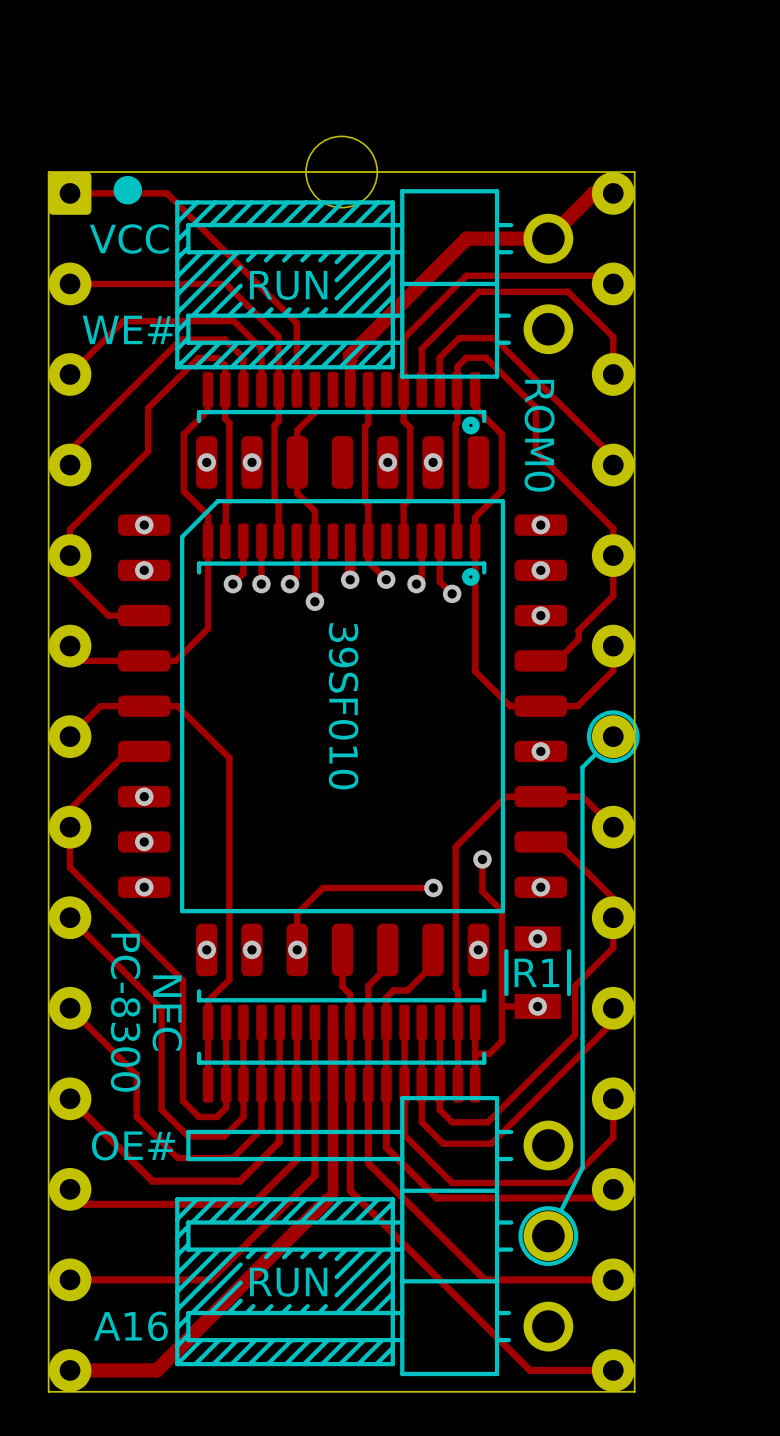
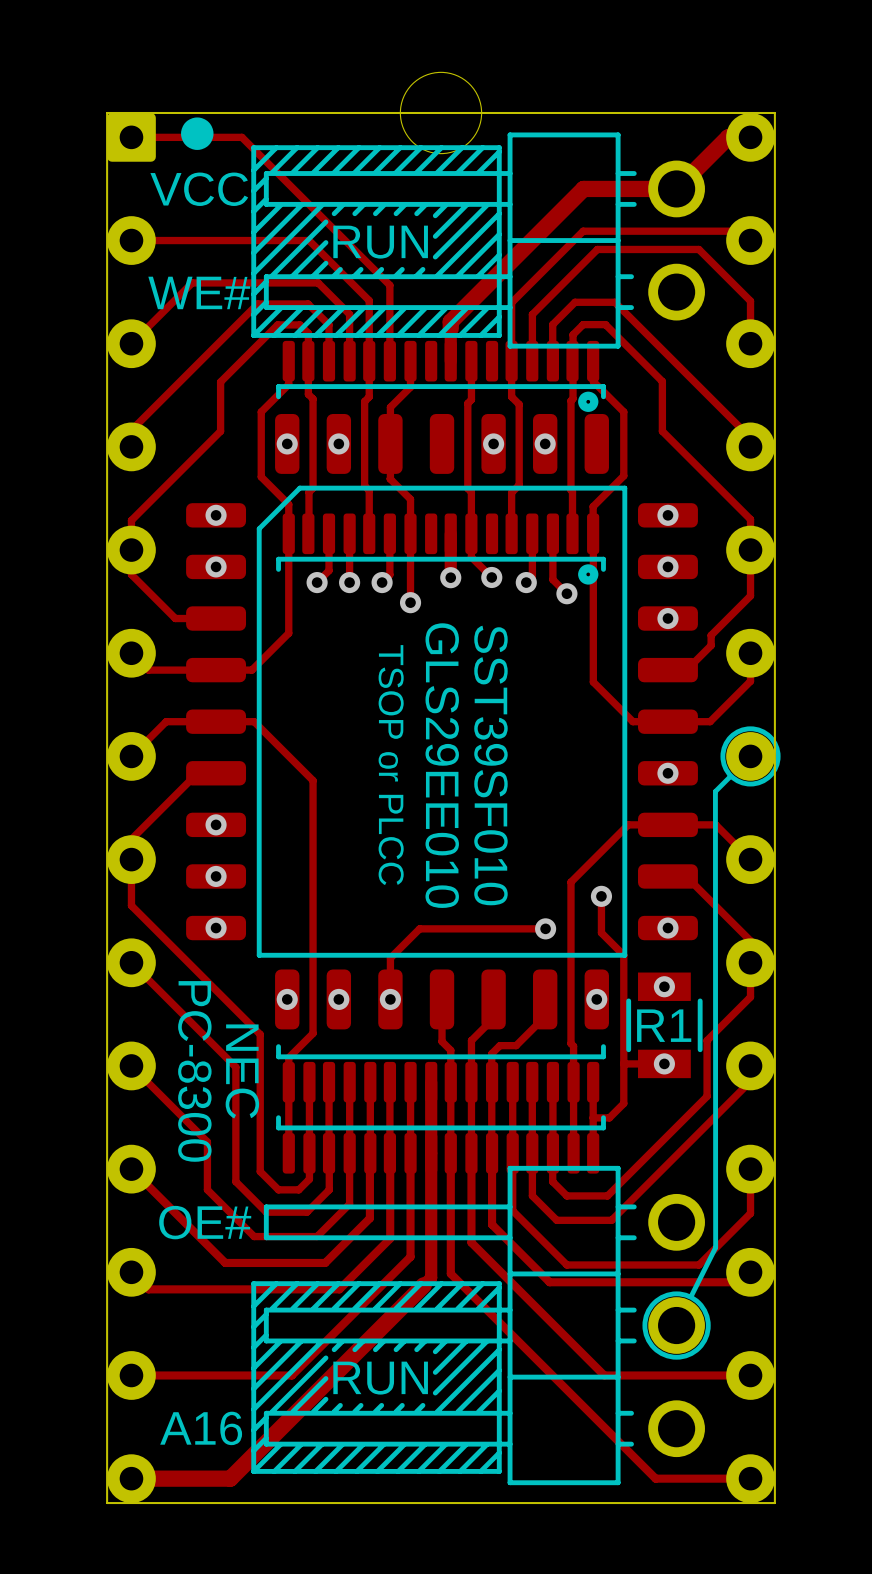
text: ROM0 (539, 435) -> none
text: 39SF010 (343, 706) -> SST39SF010 (490, 765)
text: none -> TSOP or PLCC (391, 765)
text: none -> GLS29EE010 (442, 765)

